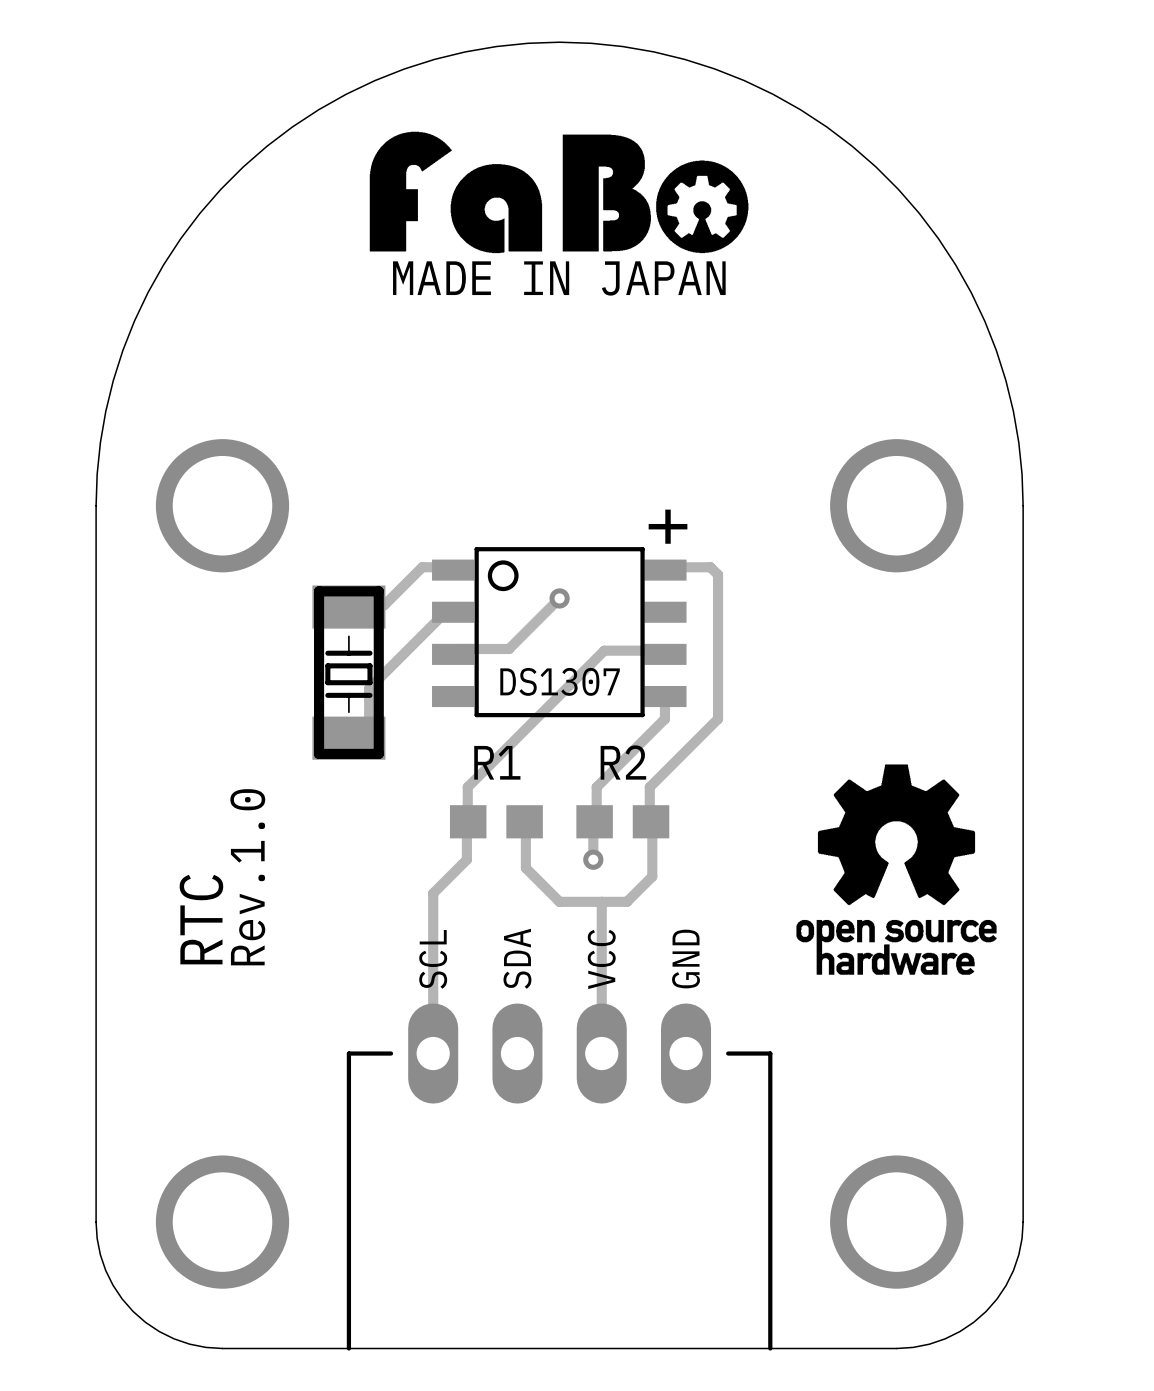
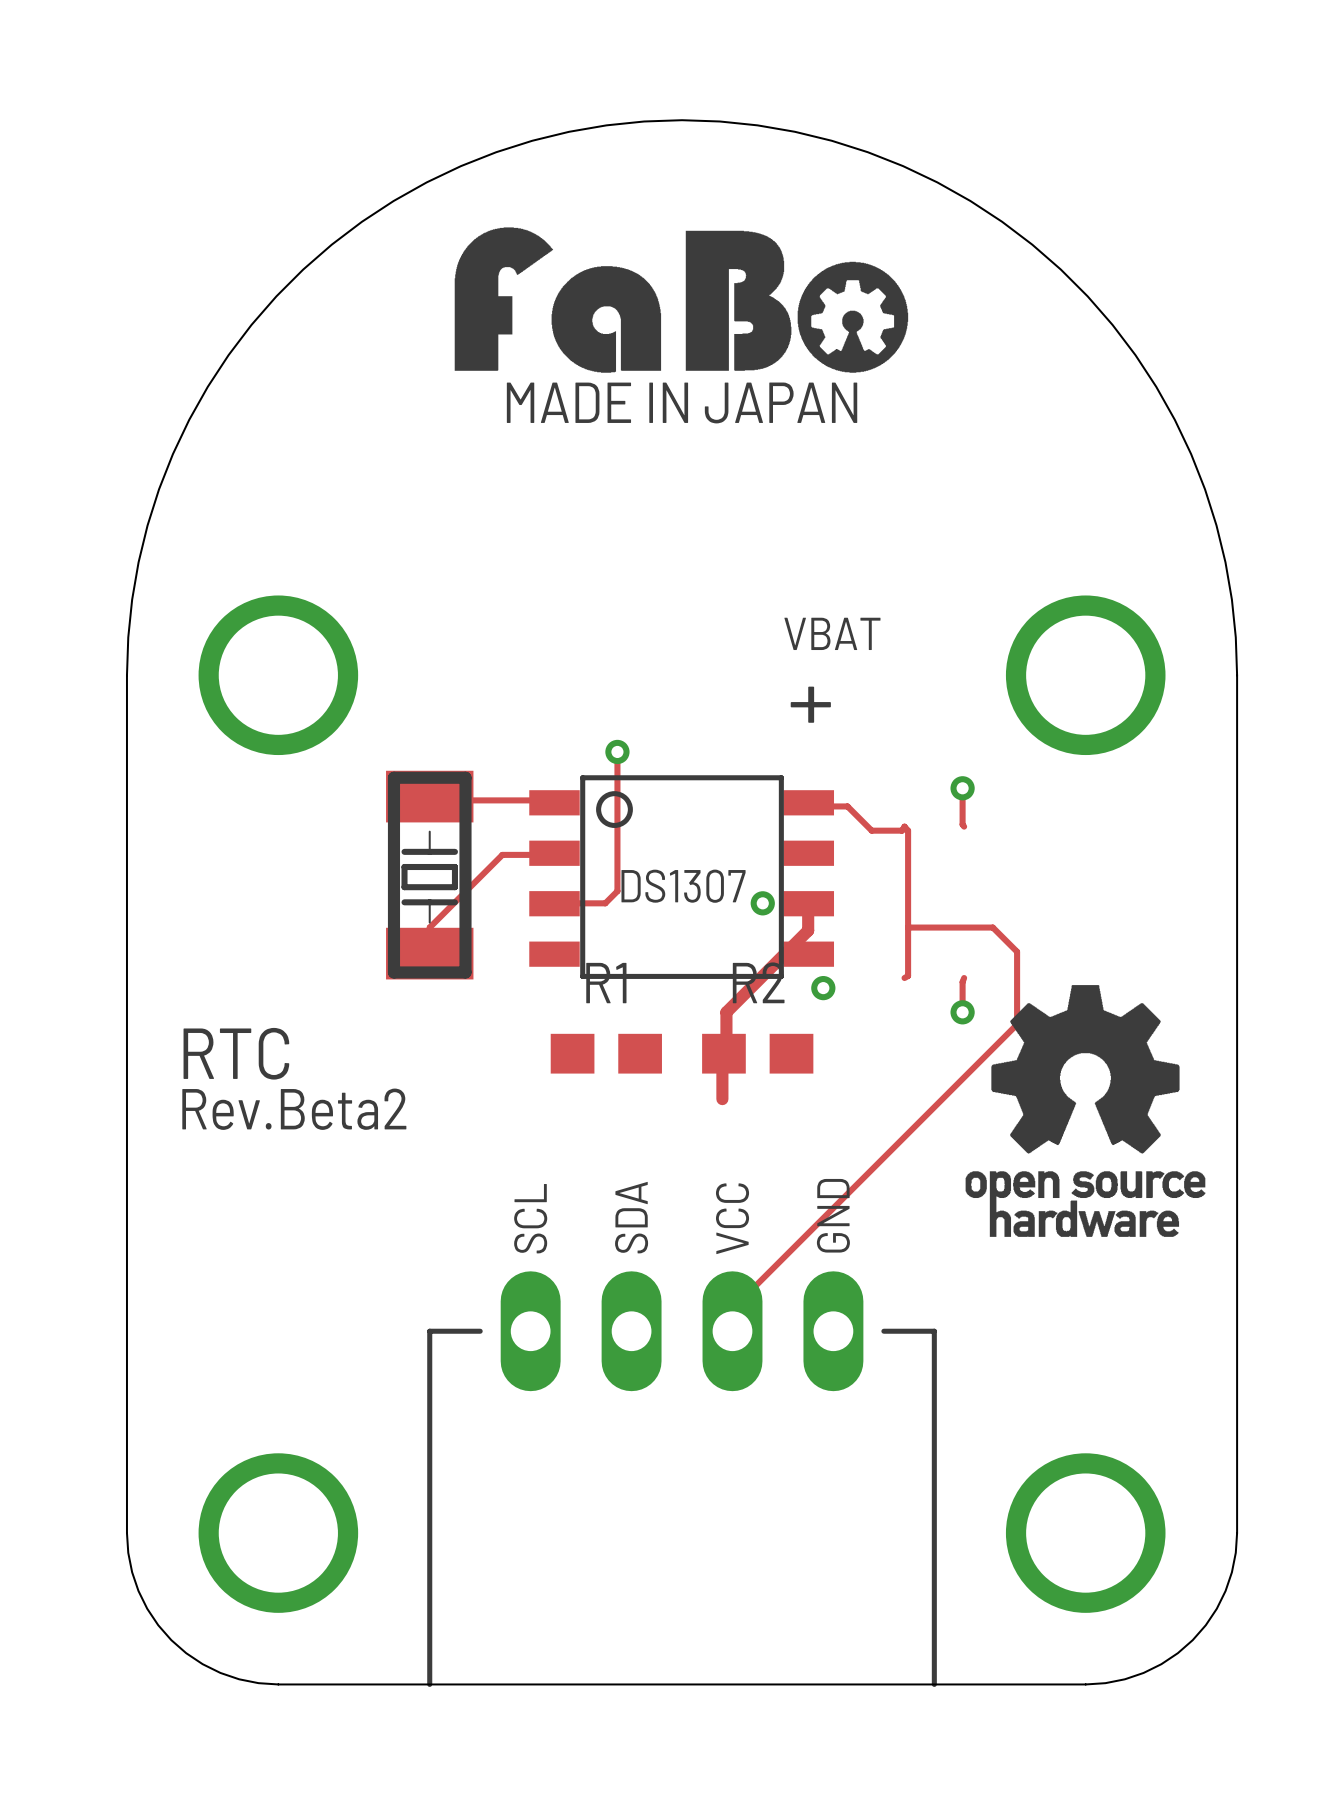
text: none -> VBAT (832, 633)
track: none -> (617, 751) (617, 891) (605, 903) (554, 903)
via: none -> (617, 751)
track: (453, 570) (452, 567) (422, 567) (384, 605) (353, 605) (348, 607) -> (554, 802) (550, 800) (429, 800) (429, 796)
track: (665, 570) (672, 567) (710, 567) (718, 574) (718, 718) (649, 787) (652, 876) (627, 901) (559, 901) (525, 868) (524, 821) -> none
track: (559, 598) (509, 649) (458, 649) (453, 654) -> none
via: (559, 598) -> none
track: none -> (962, 788) (964, 826)
via: none -> (962, 788)
track: (453, 612) (444, 612) (369, 688) (369, 718) (348, 738) -> (554, 853) (550, 854) (502, 854) (429, 927) (429, 953)
track: none -> (808, 802) (811, 806) (847, 806) (871, 830) (902, 830) (904, 826) (908, 830) (908, 976) (904, 978)
part position: (559, 632) -> (681, 877)
track: (665, 654) (664, 650) (604, 650) (467, 787) (466, 859) (433, 893) (433, 1053) -> none
via: none -> (762, 903)
track: none -> (964, 978) (962, 1012)
via: none -> (823, 988)
via: none -> (962, 1012)
via: (593, 859) -> none
text: none -> Rev.Beta2 (294, 1109)
text: Rev.1.0 (247, 877) -> none
track: (601, 901) (601, 1034) -> (908, 927) (992, 927) (1017, 951) (1017, 1024) (732, 1309)
text rotation: 0° (201, 919) -> 90° clockwise (236, 1053)

